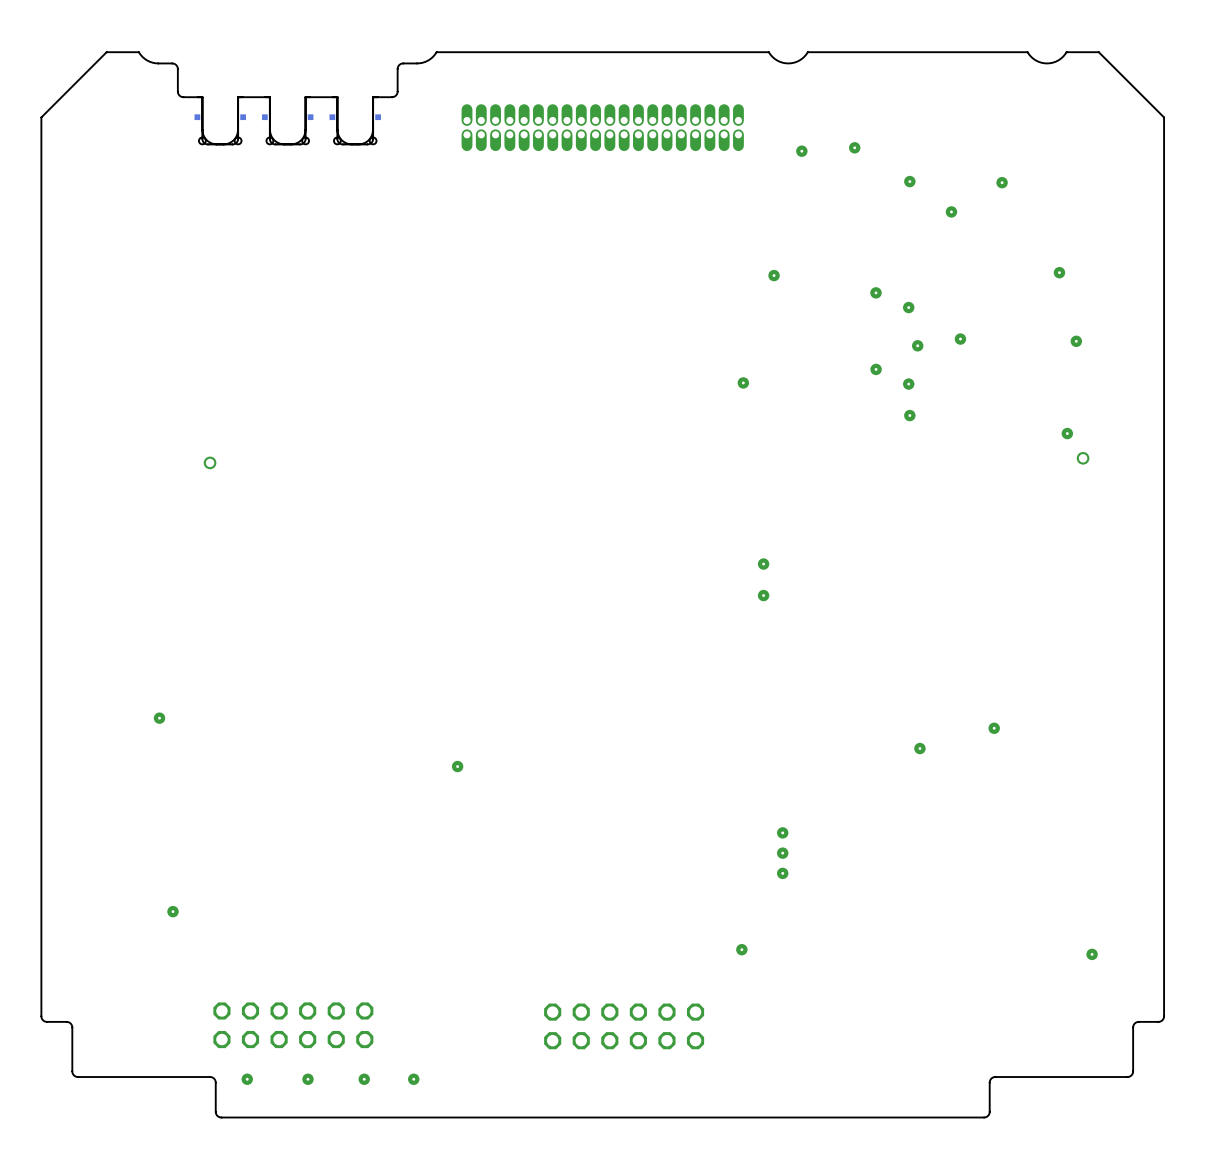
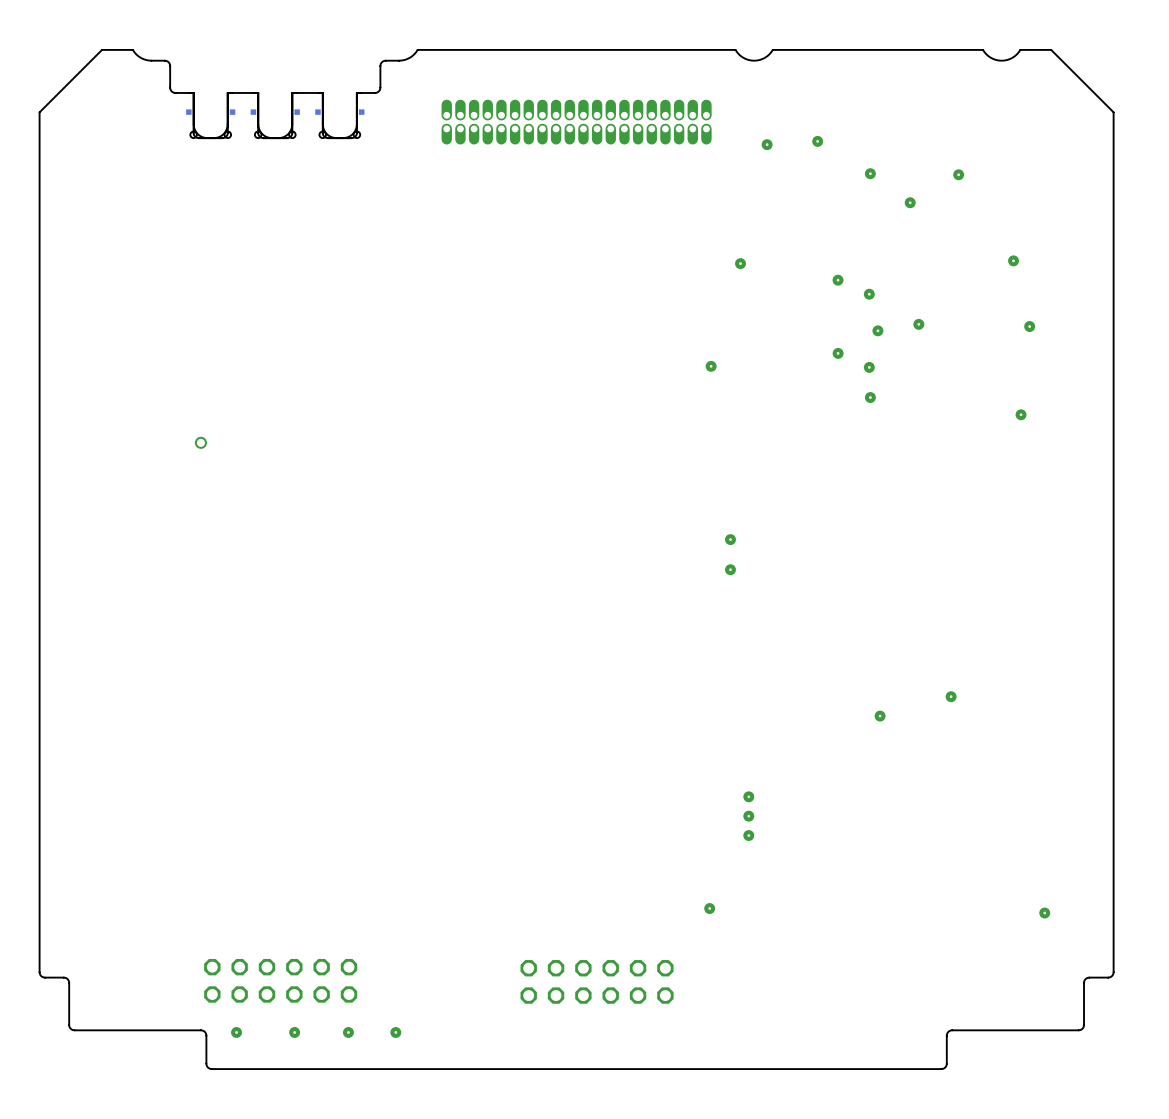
part: (1083, 458) -> none
part: (159, 718) -> none
part: (457, 766) -> none
part: (173, 911) -> none

